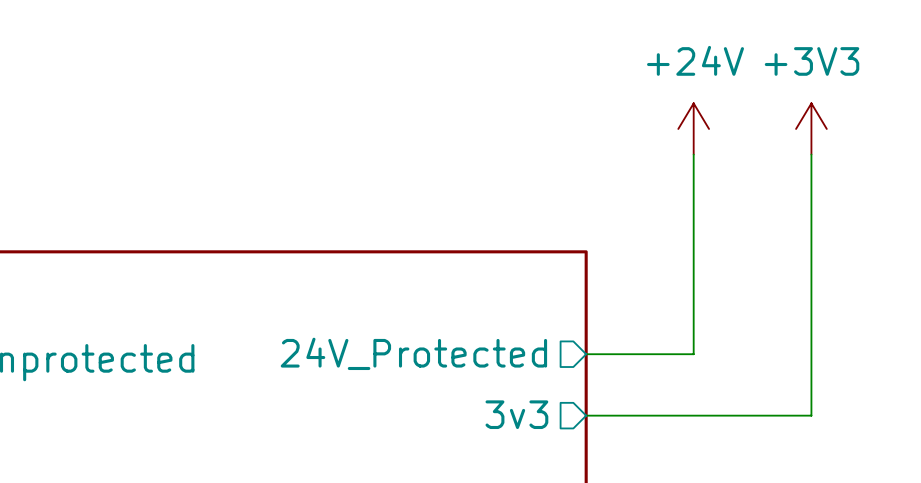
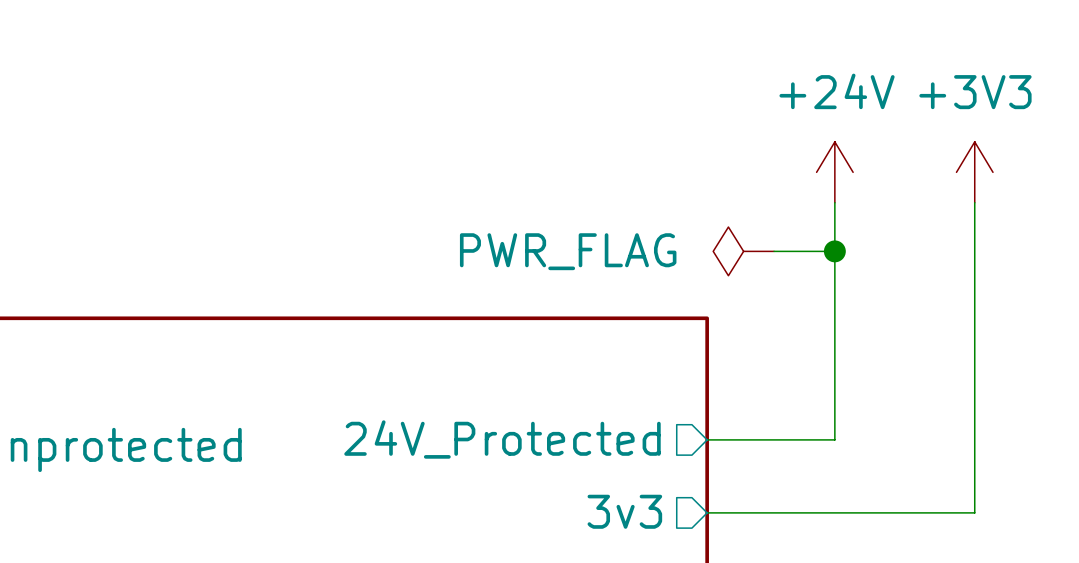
power symbol: none -> PWR_FLAG (743, 251)
wire: none -> (774, 251) (834, 251)
junction: none -> (834, 251)

